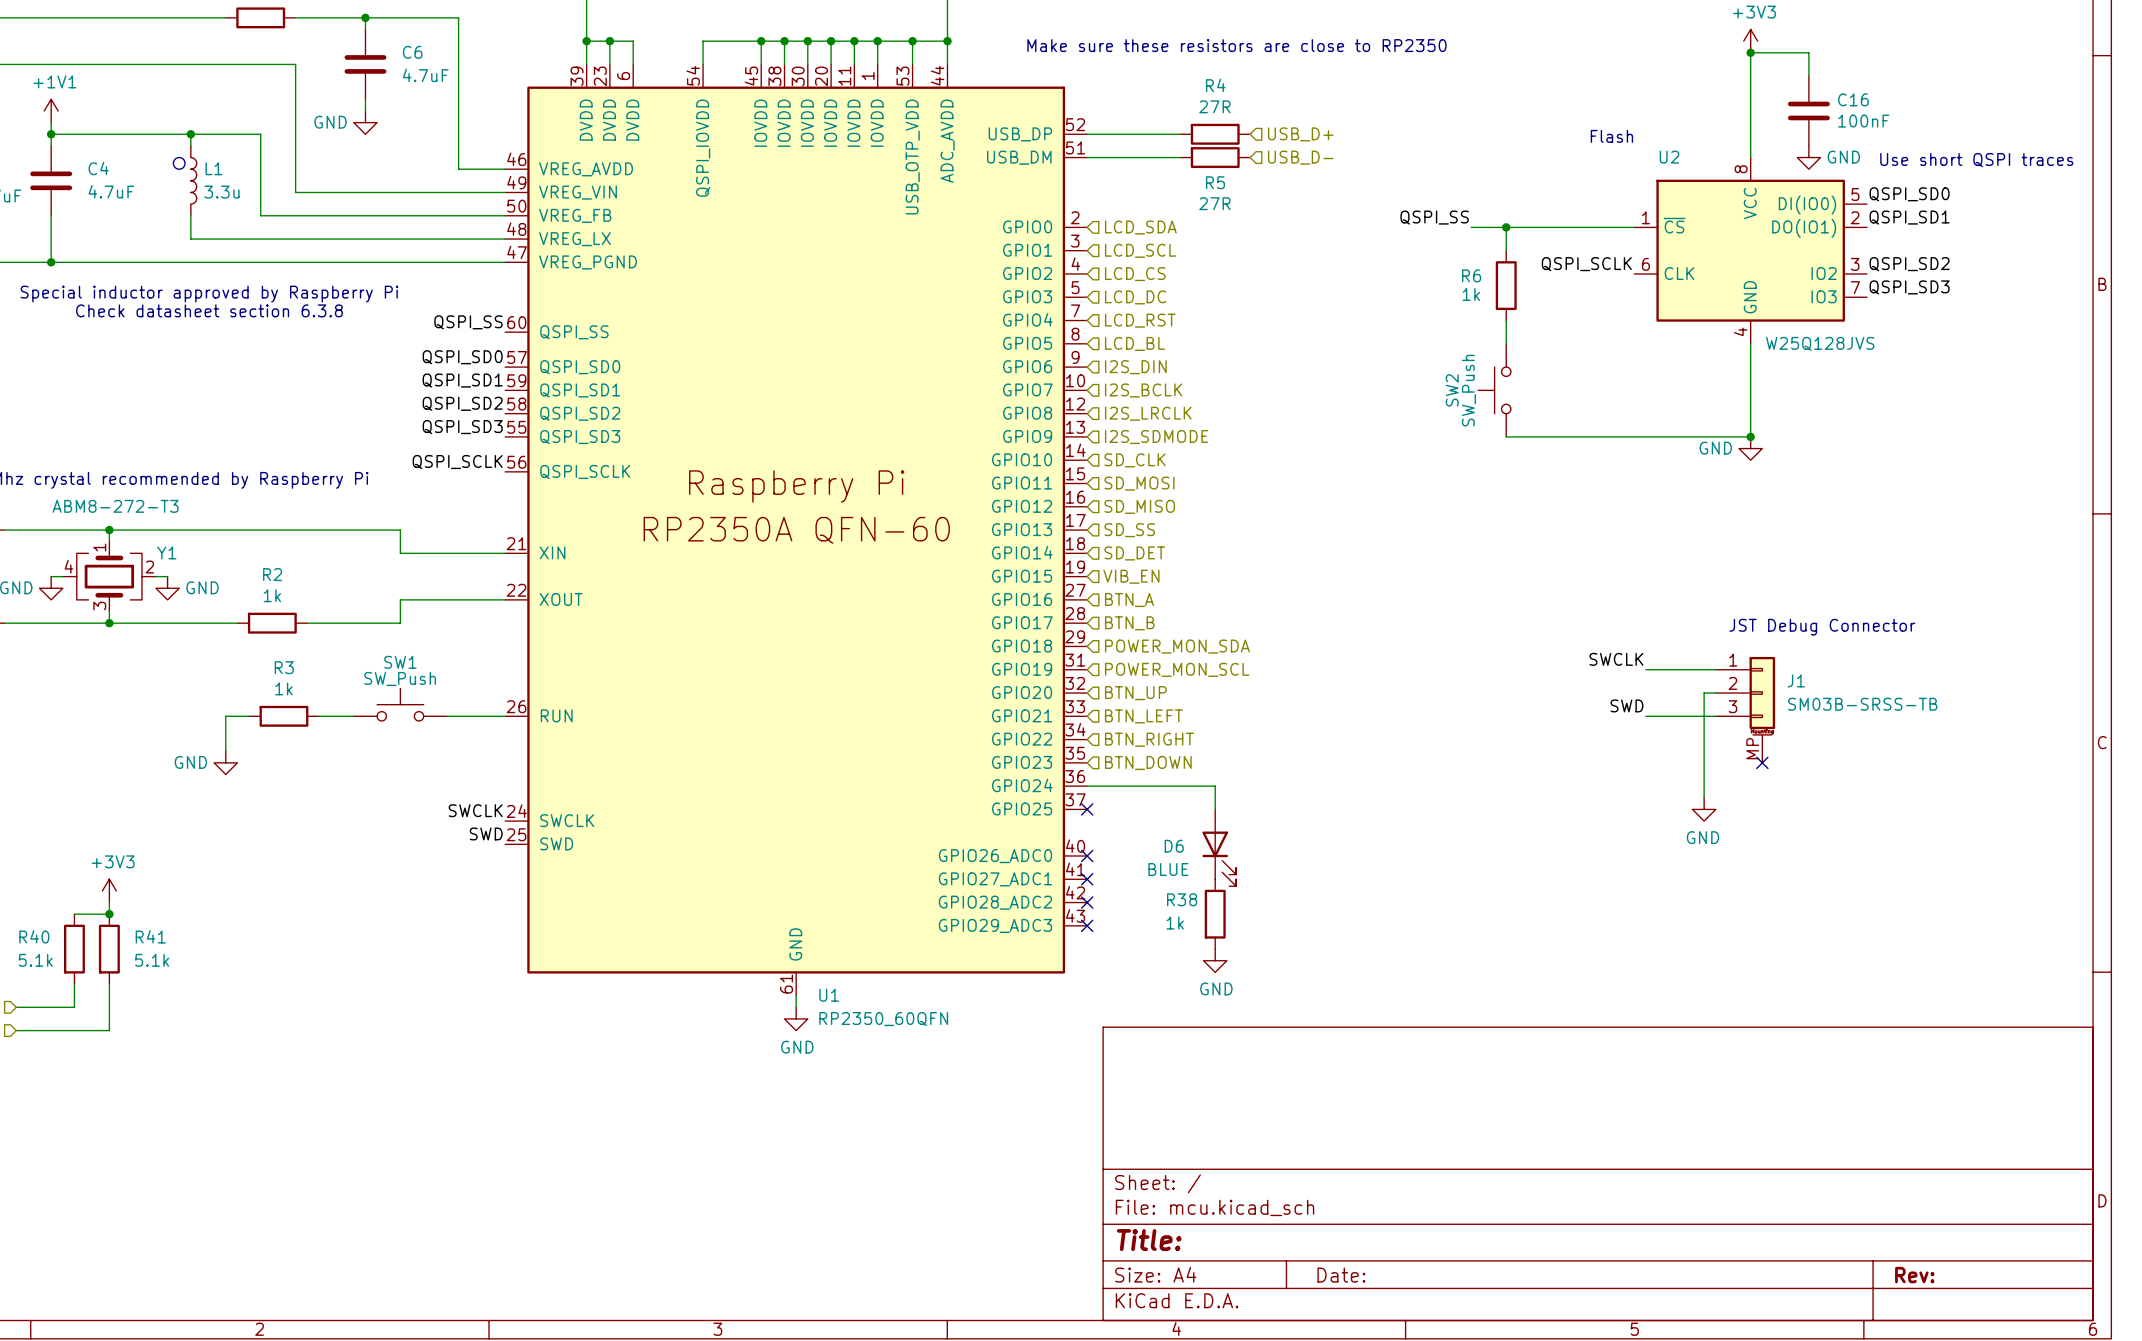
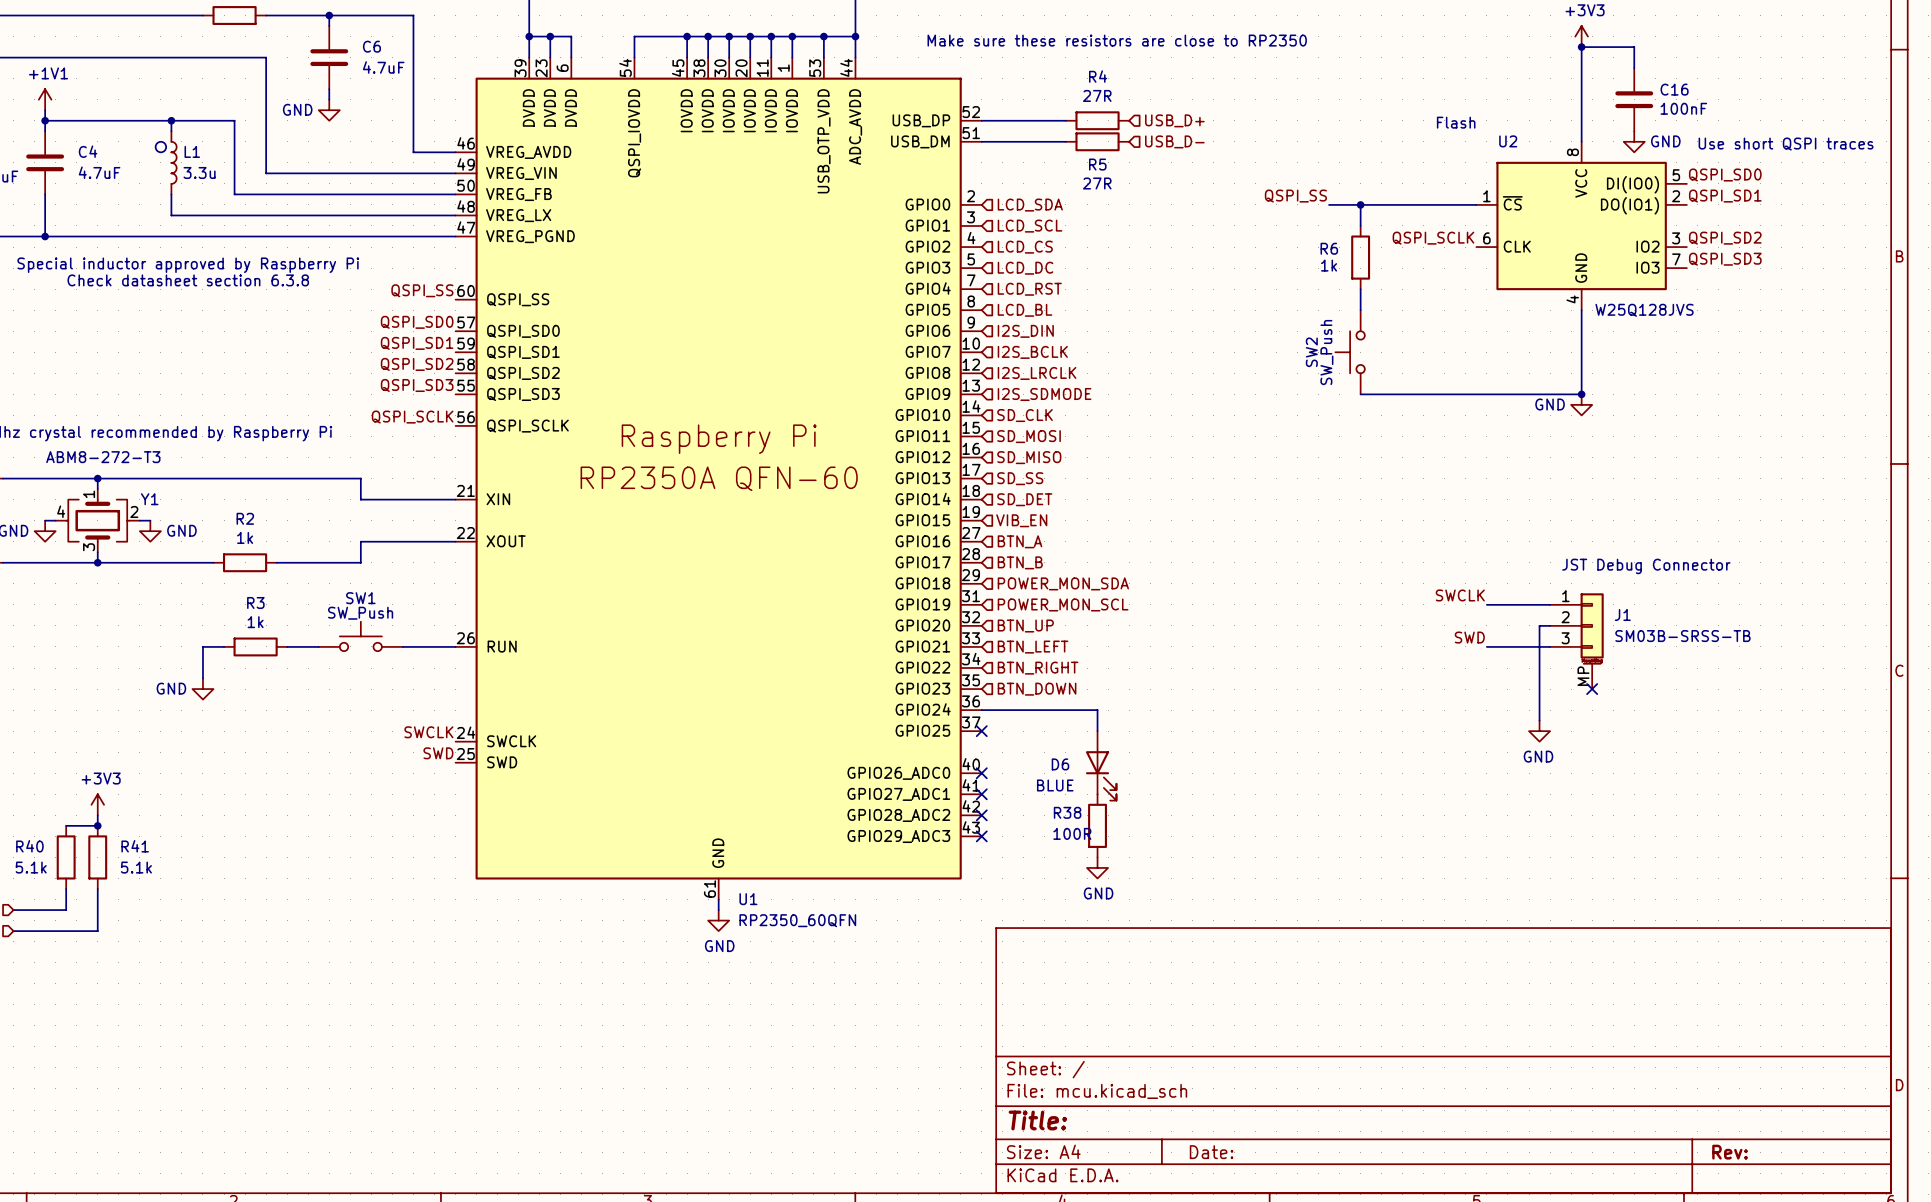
R38 value: 1k (1175, 923) -> 100R (1072, 833)

